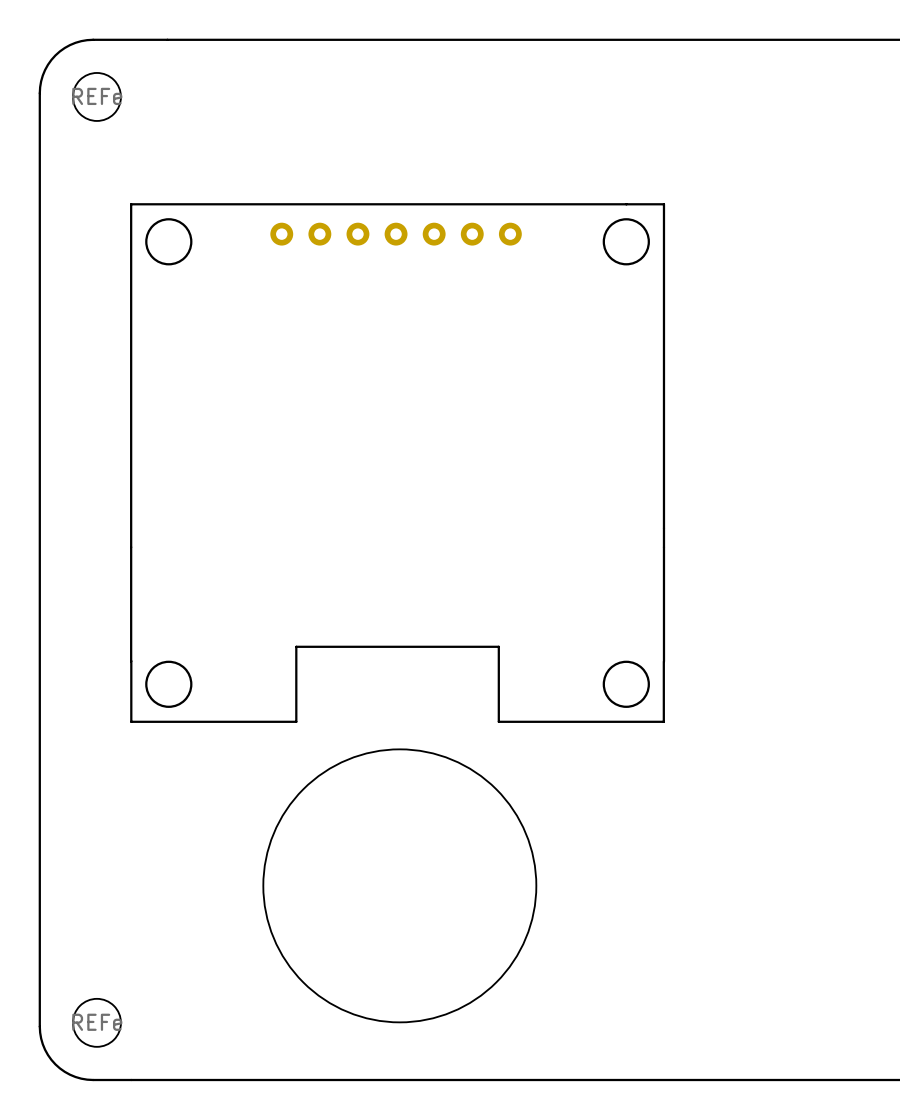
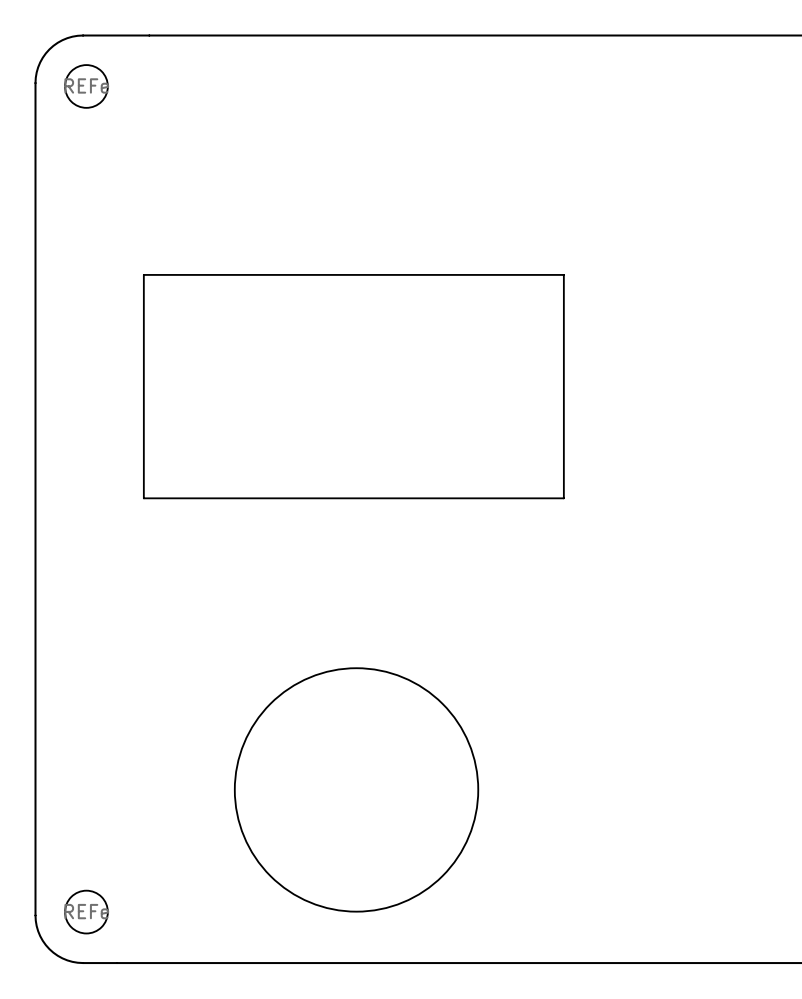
board edge: none -> (143, 274) (563, 274) (563, 498) (143, 498) (143, 274)
part: (397, 463) -> none

